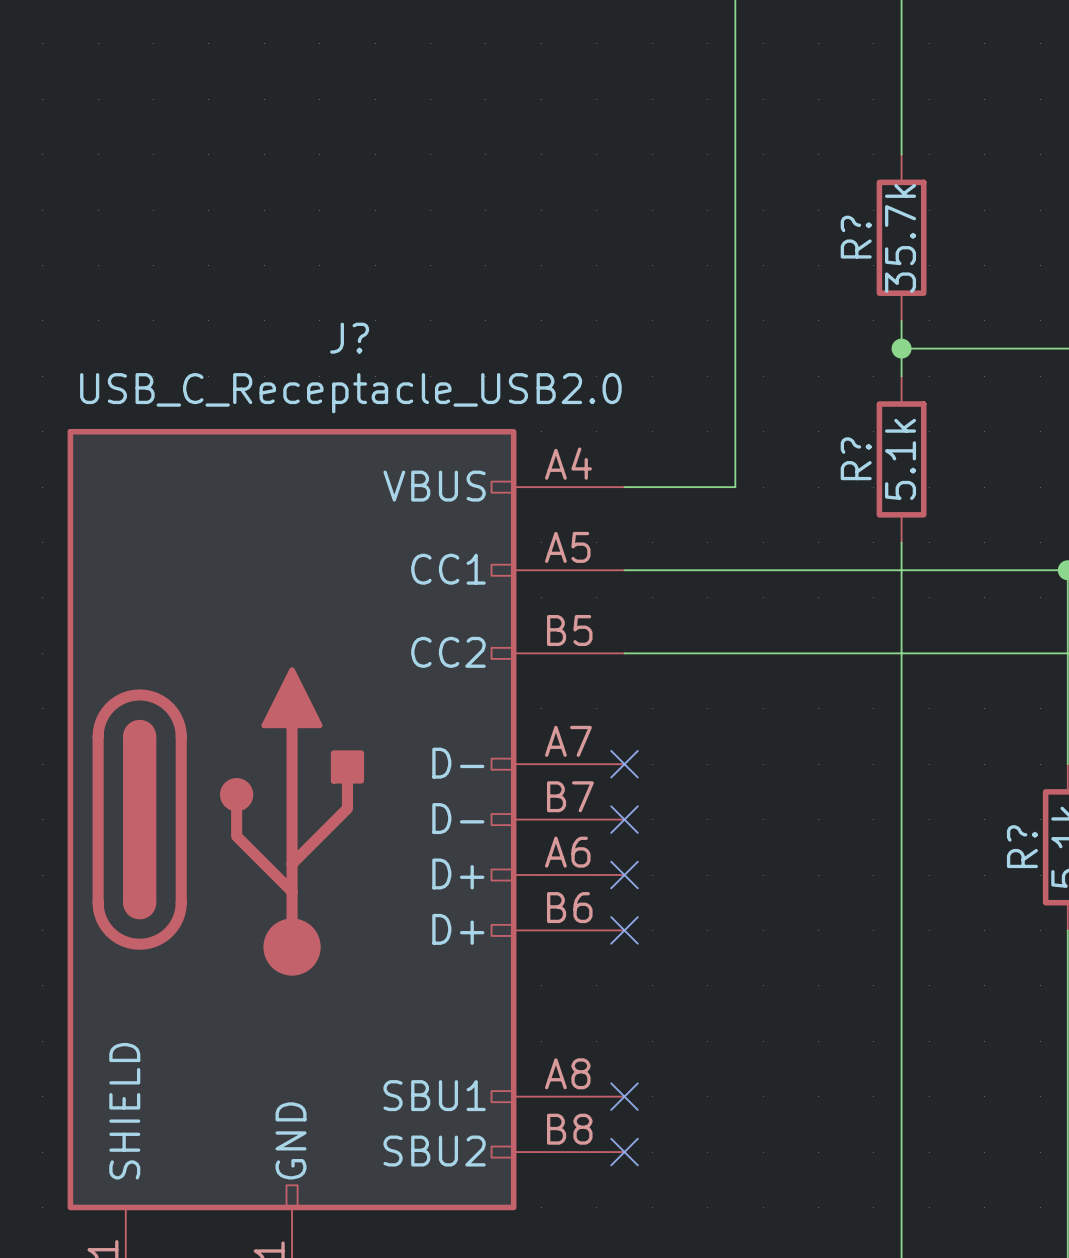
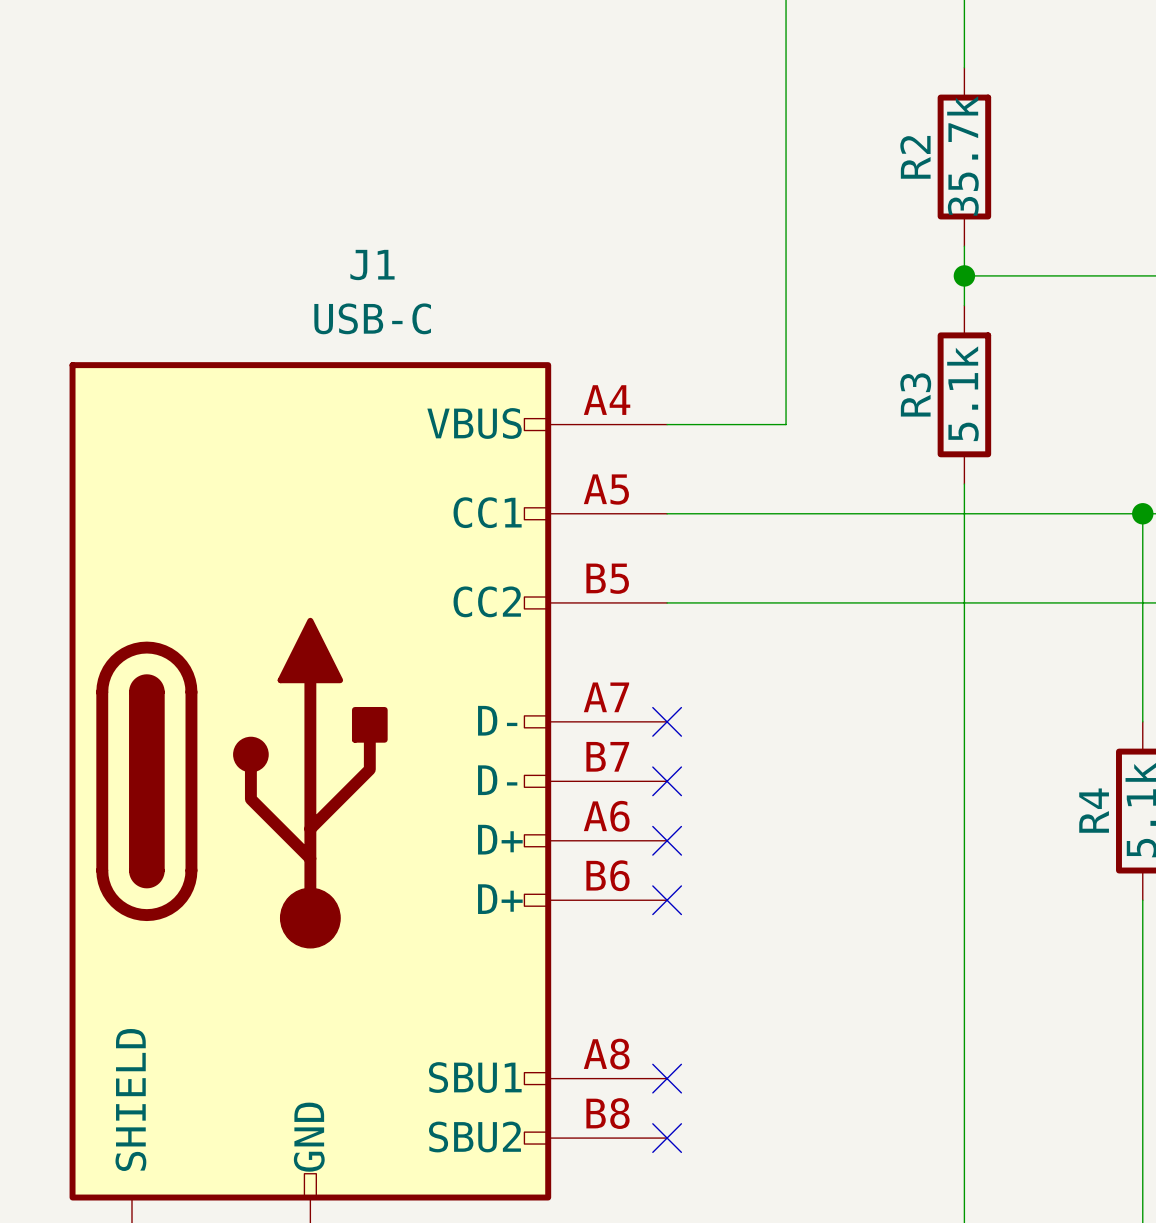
R? name: R? (856, 237) -> R2 (915, 157)
J? name: J? (349, 338) -> J1 (372, 265)
J? value: USB_C_Receptacle_USB2.0 (350, 393) -> USB-C (372, 318)
R? name: R? (856, 458) -> R3 (915, 394)
R? name: R? (1022, 846) -> R4 (1094, 810)

